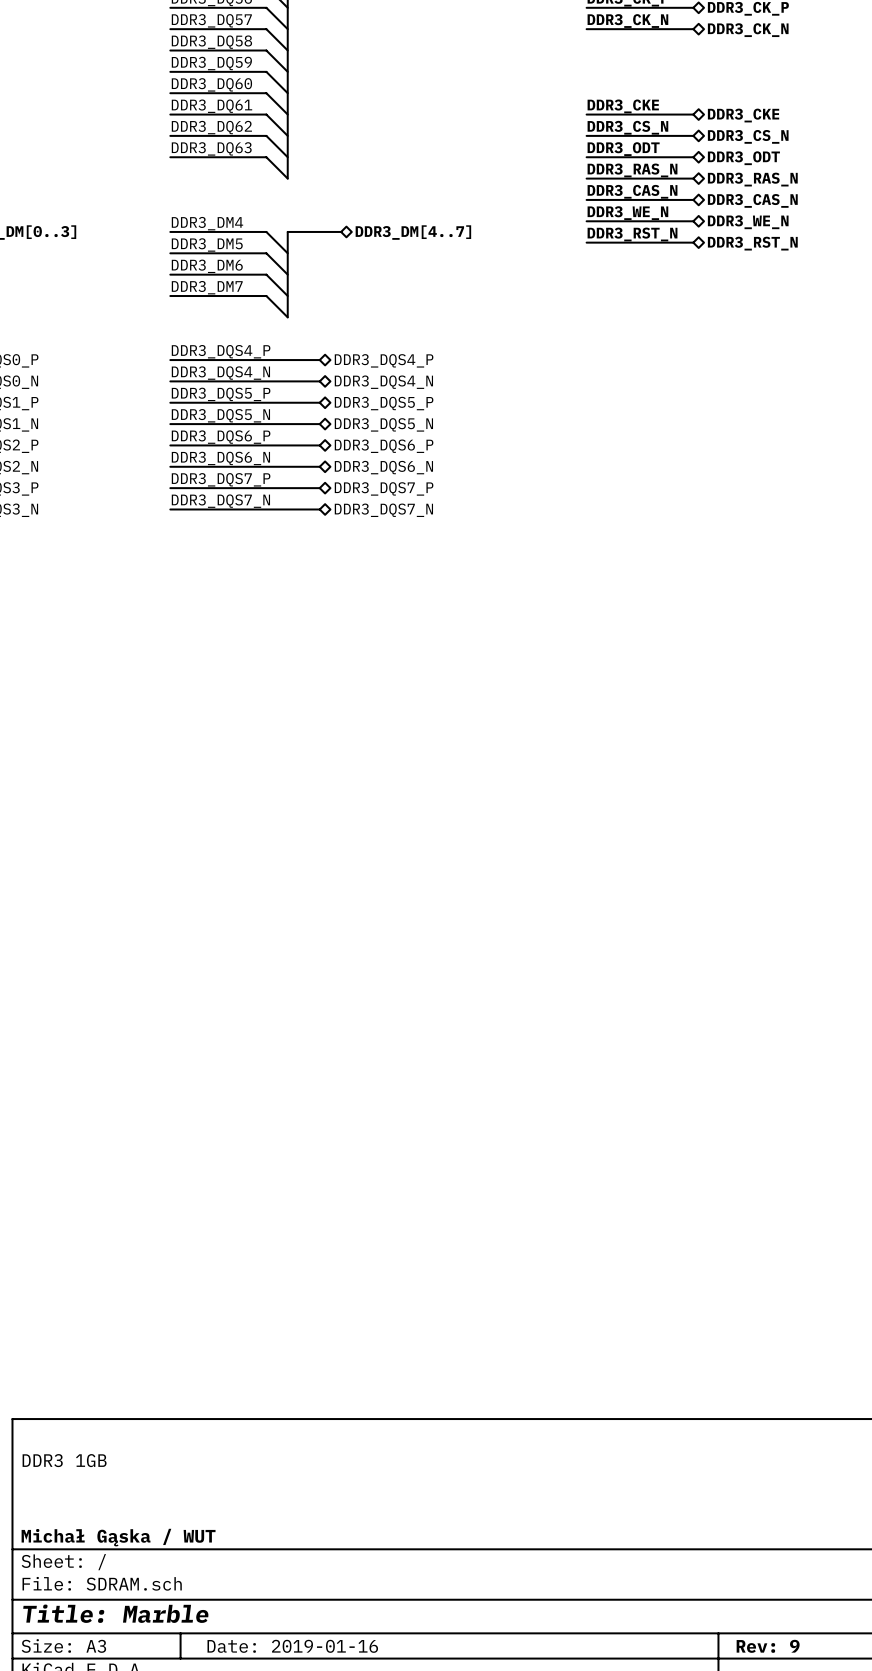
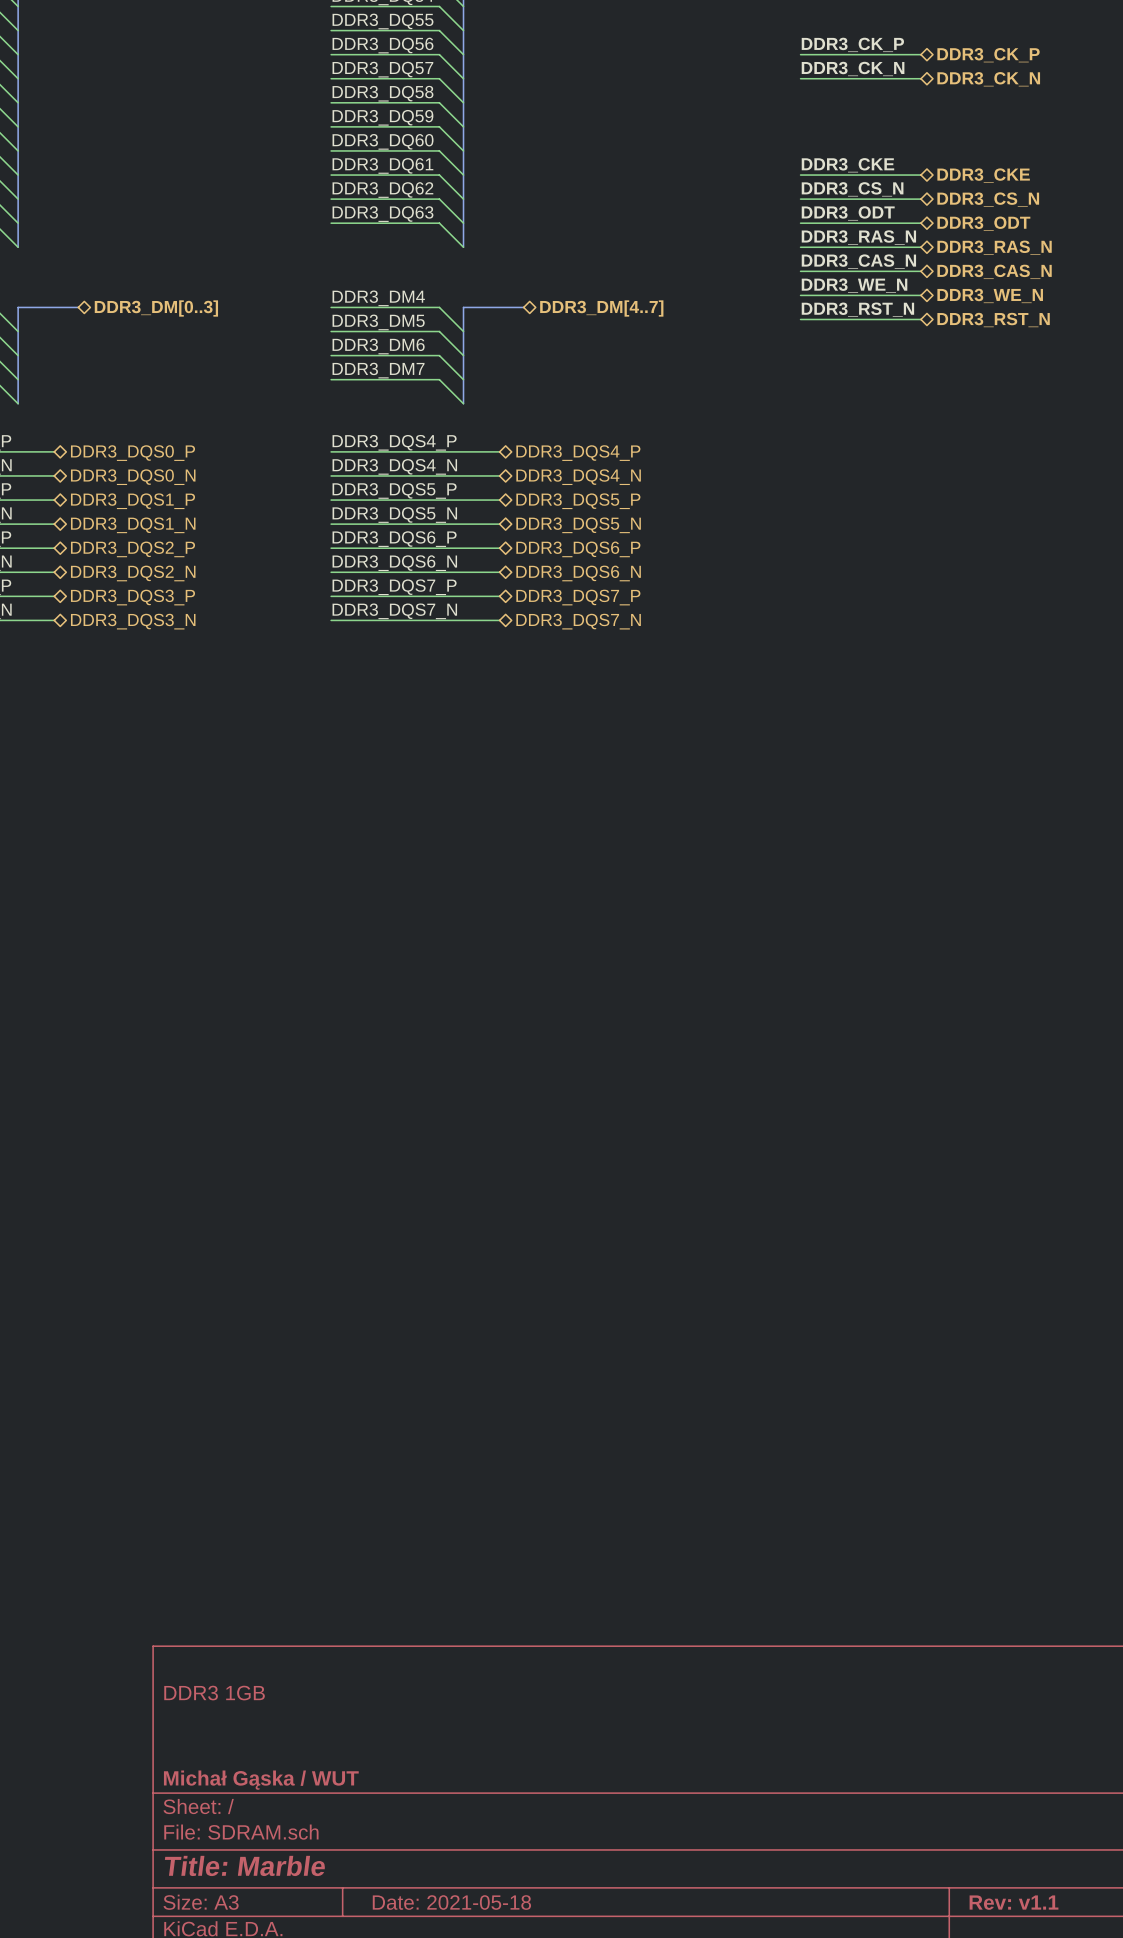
title block: Date: 2019-01-16 (292, 1646) -> Date: 2021-05-18 (451, 1902)
title block: Rev: 9 (768, 1646) -> Rev: v1.1 (1014, 1902)

